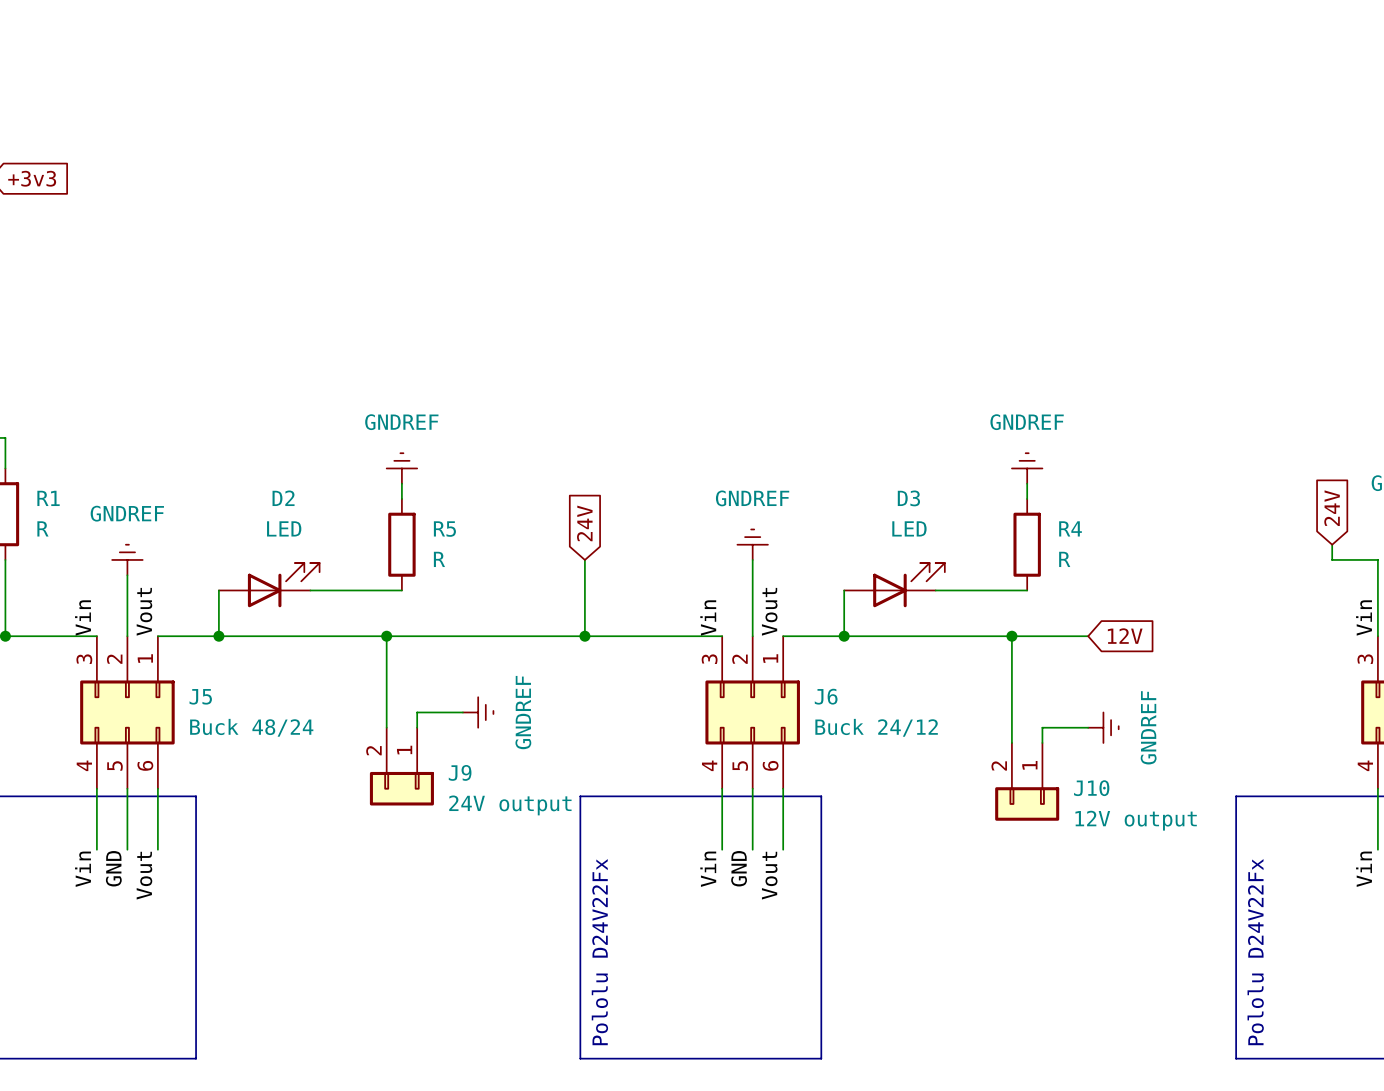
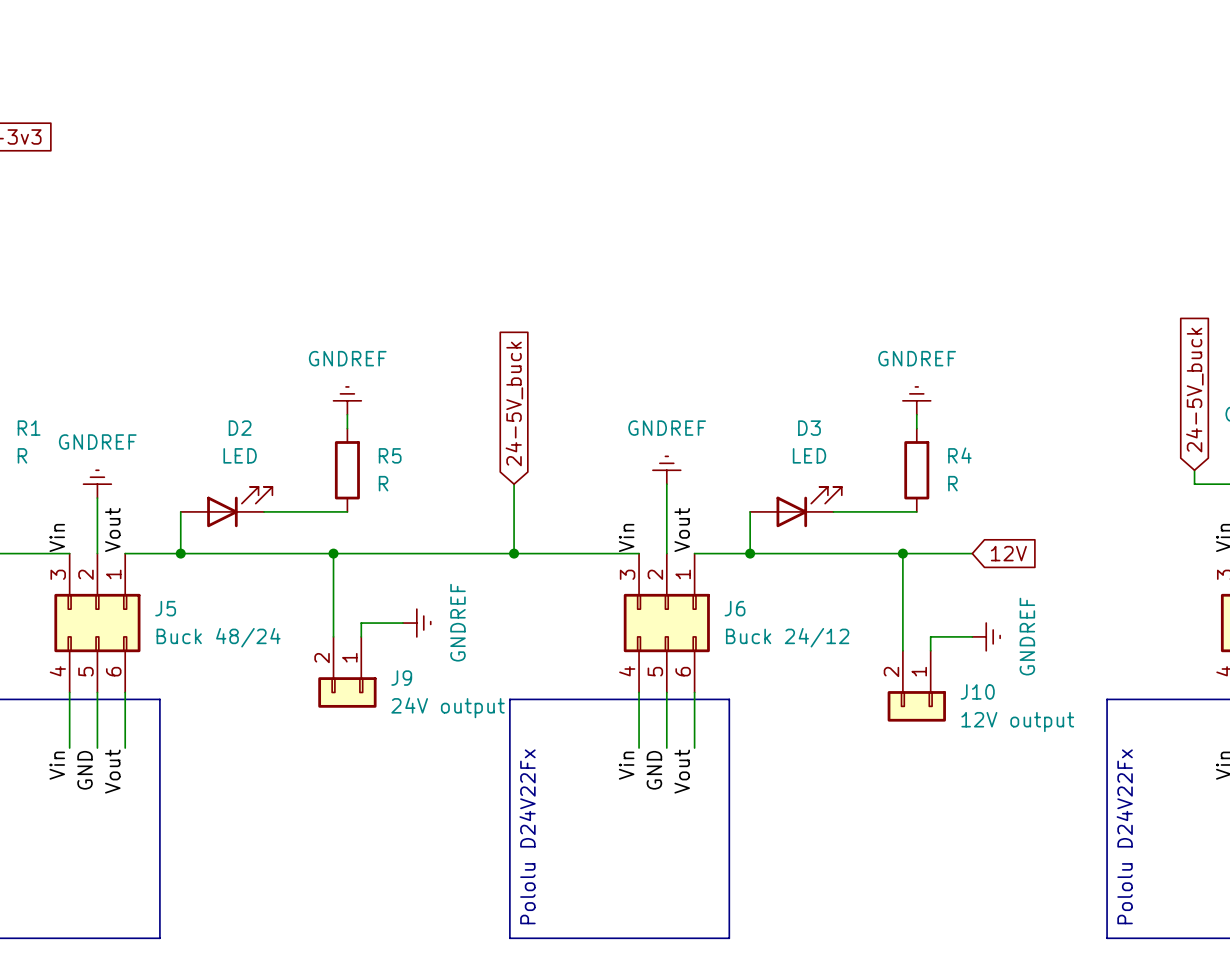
global label: 24V (1332, 508) -> 24-5V_buck (1194, 390)
global label: 24V (584, 523) -> 24-5V_buck (514, 403)

